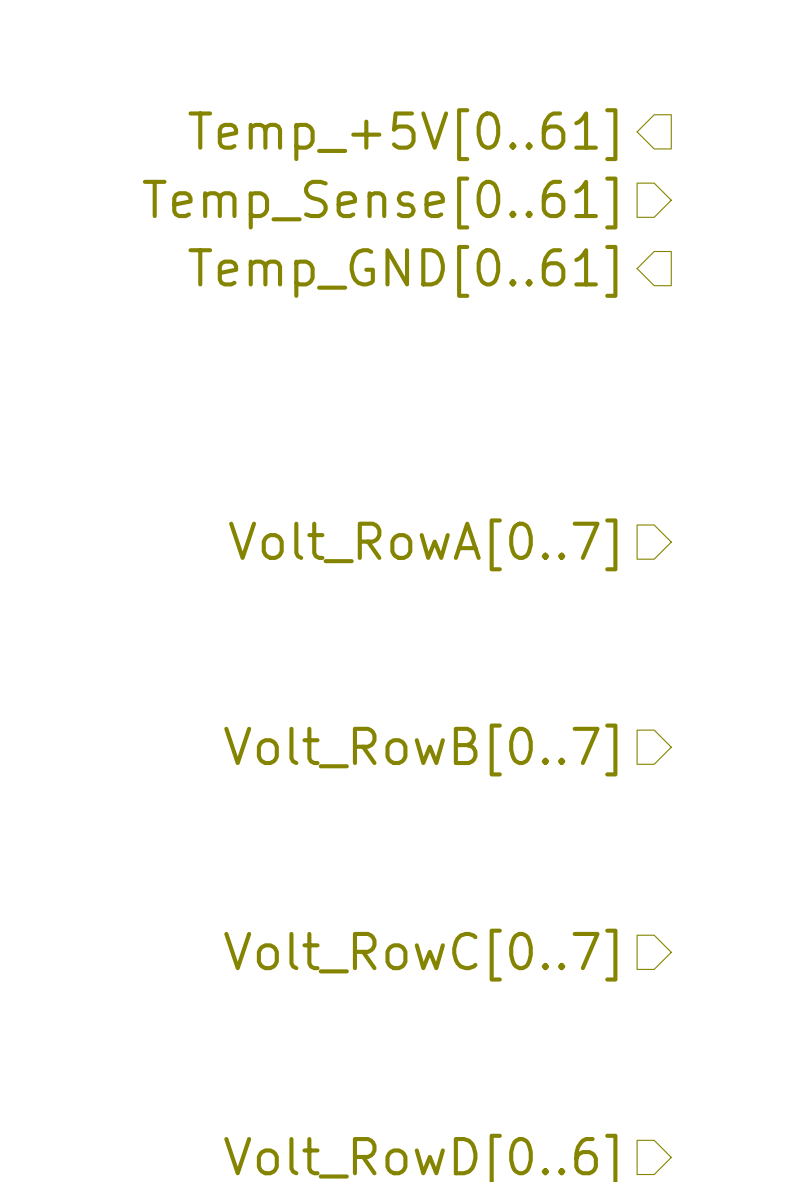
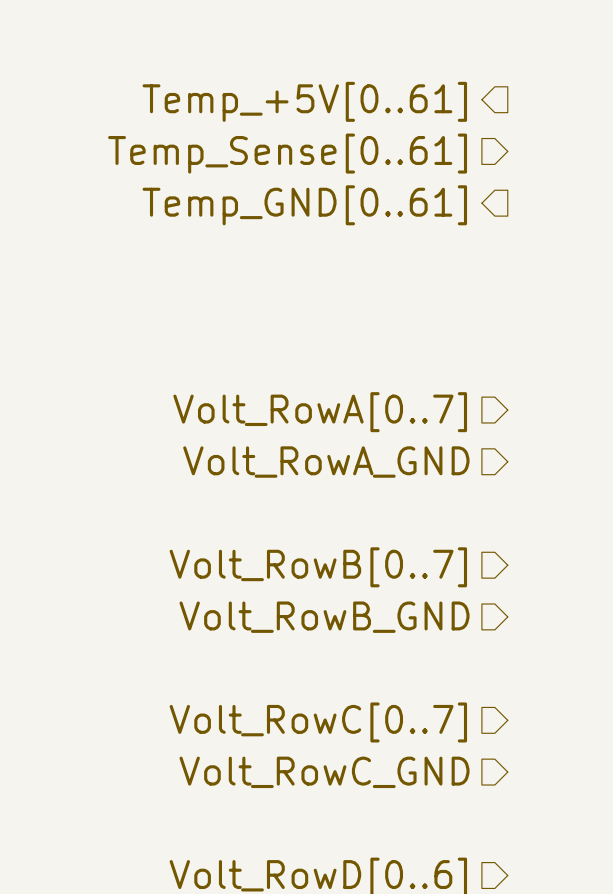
hierarchical label: none -> Volt_RowA_GND (326, 462)
hierarchical label: none -> Volt_RowB_GND (324, 617)
hierarchical label: none -> Volt_RowC_GND (324, 772)

